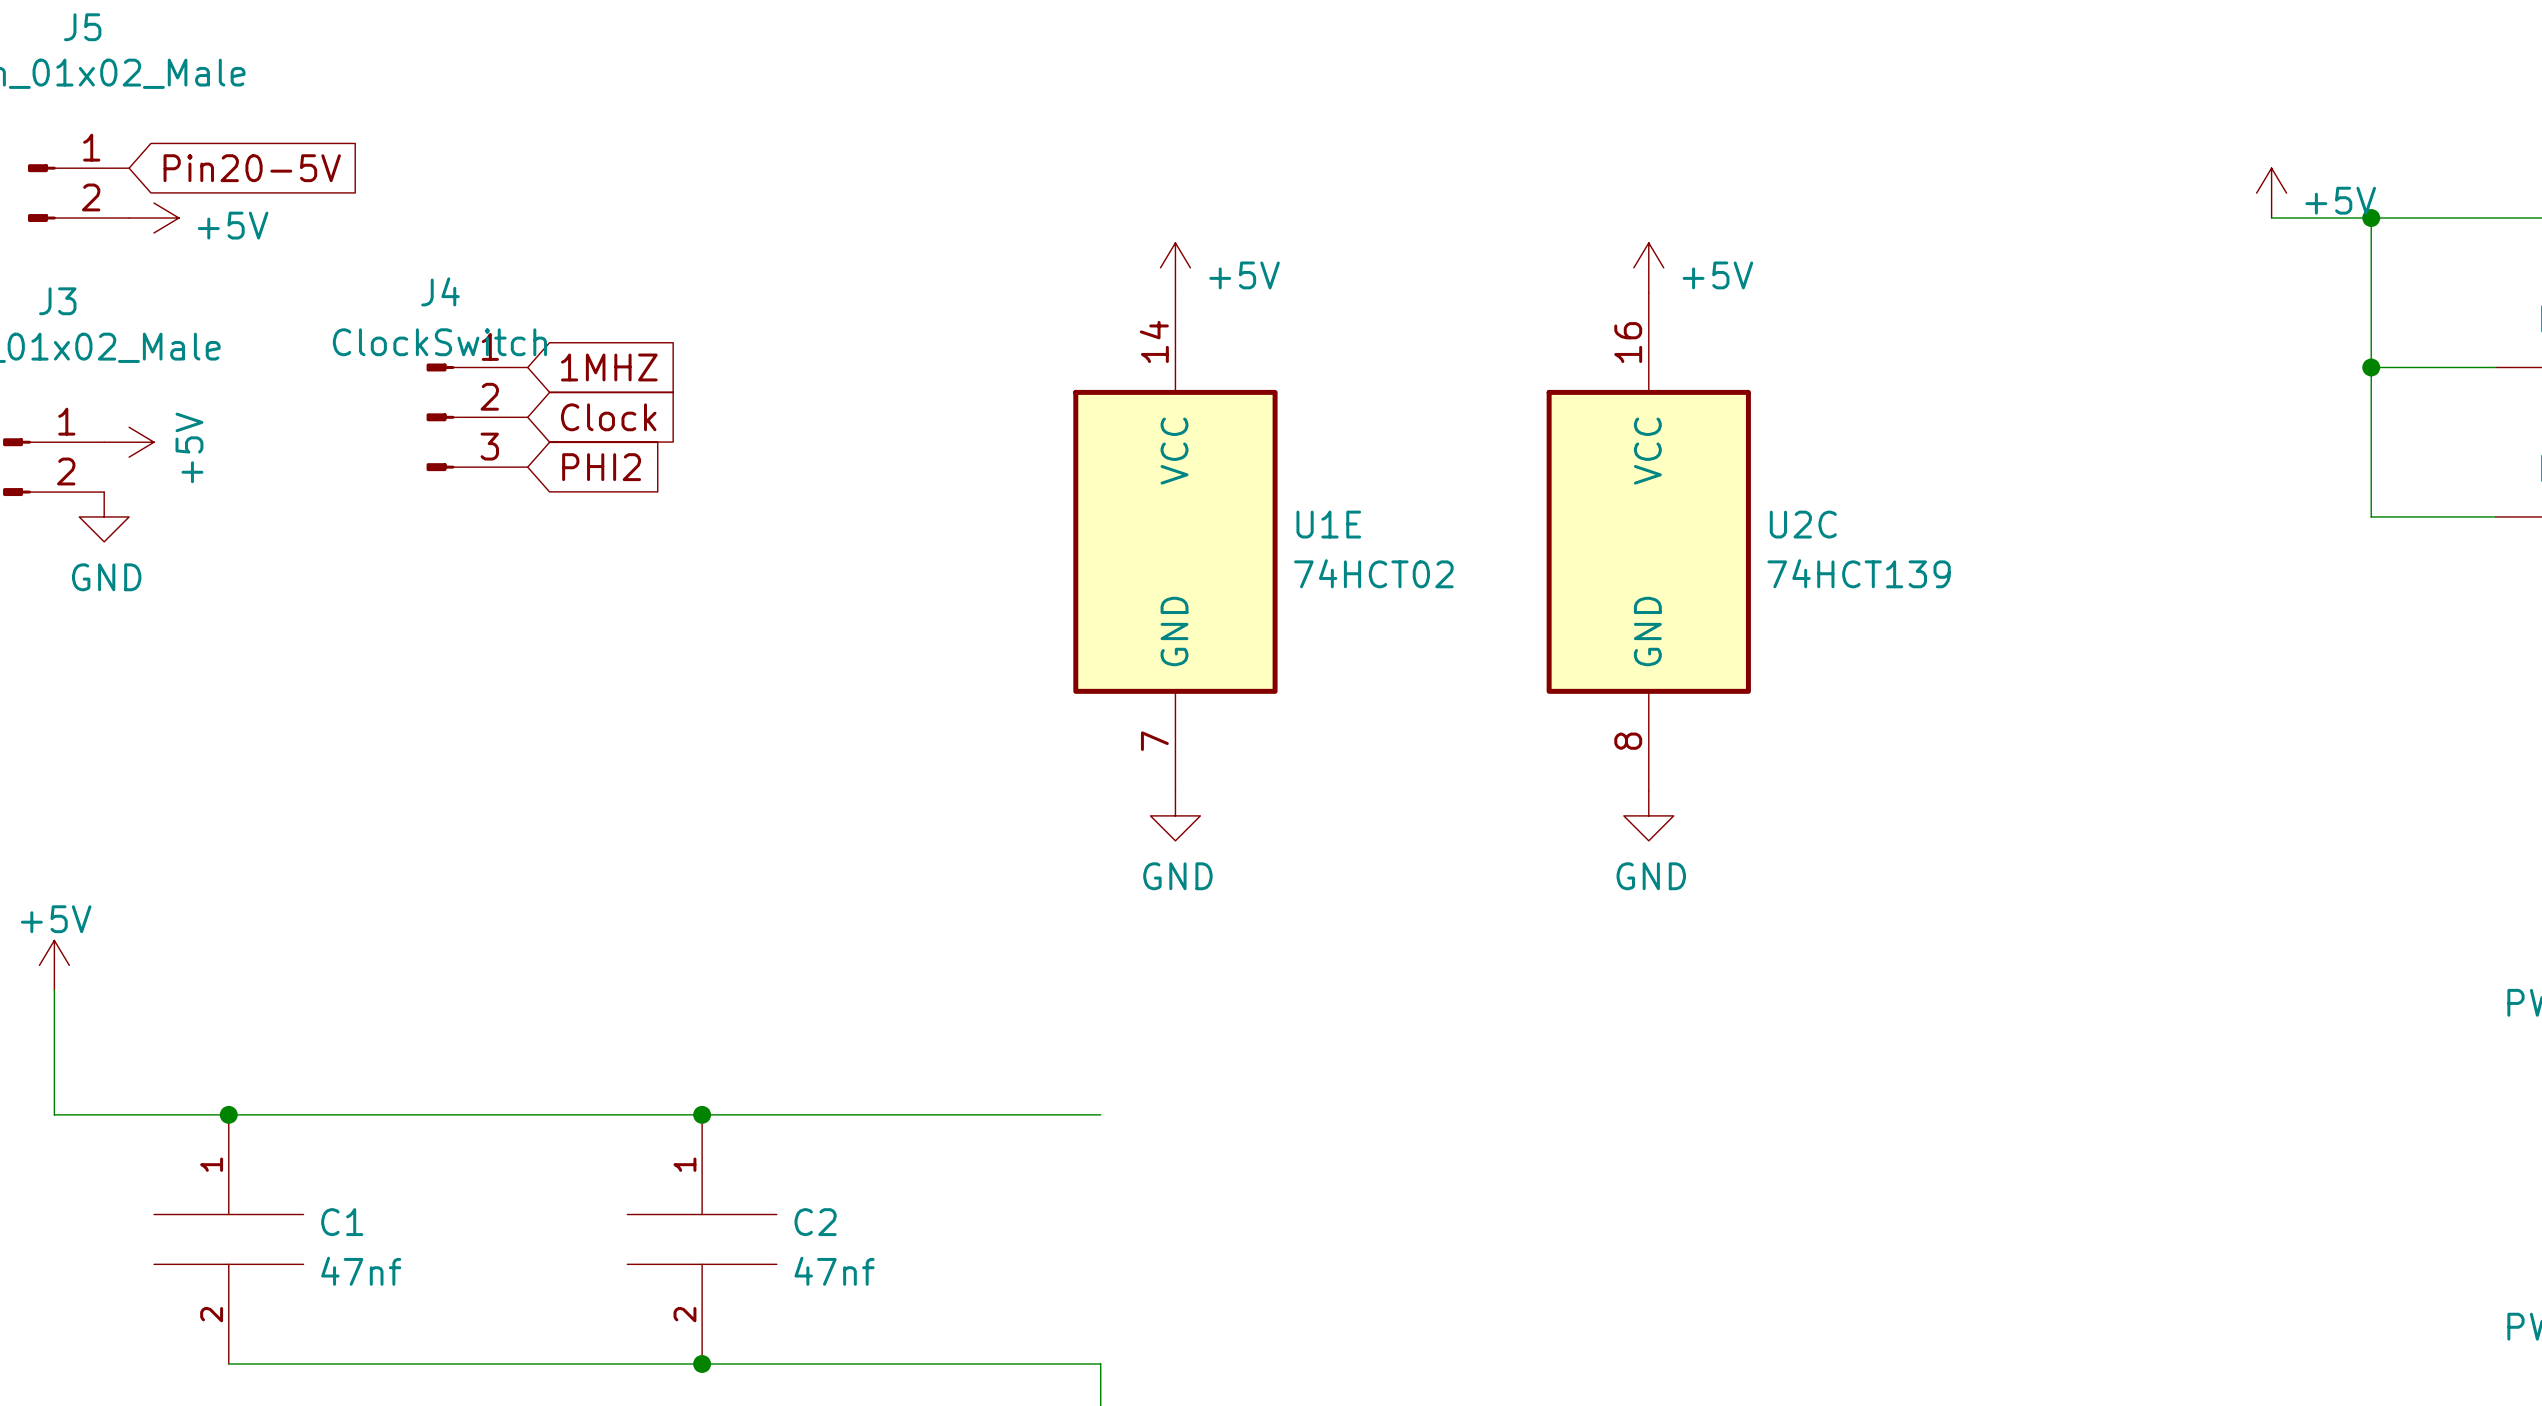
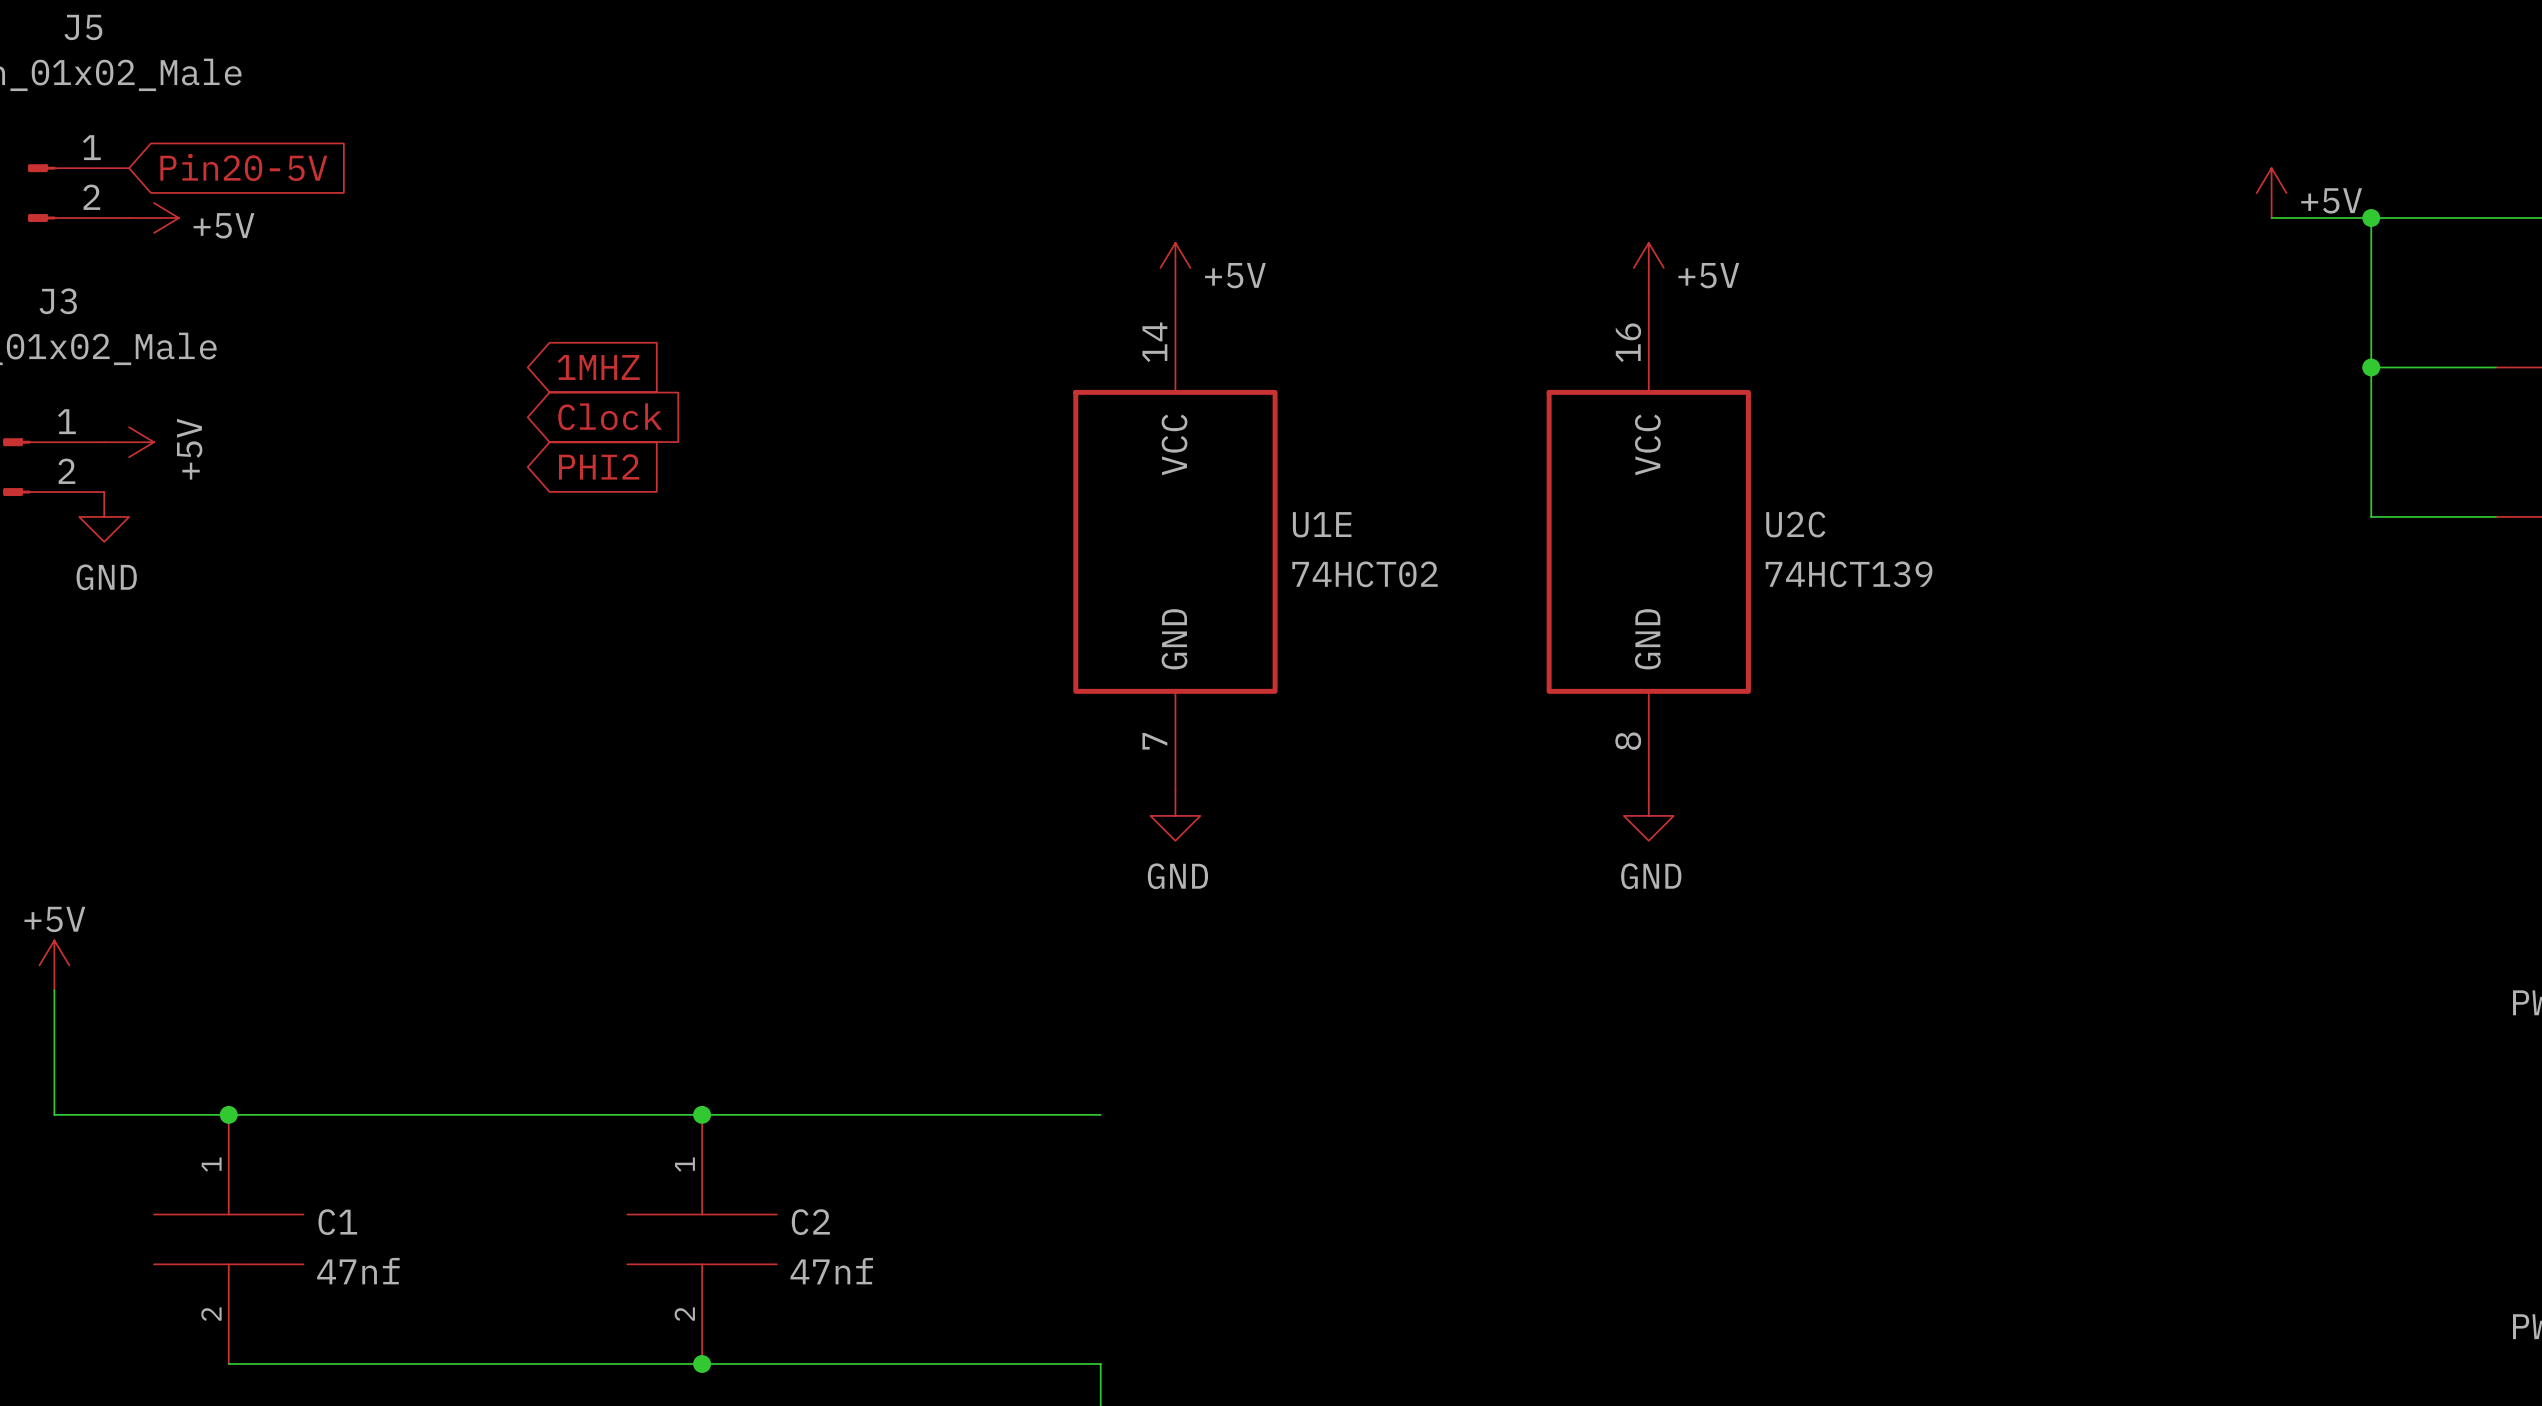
J4: ClockSwitch (477, 417) -> none

